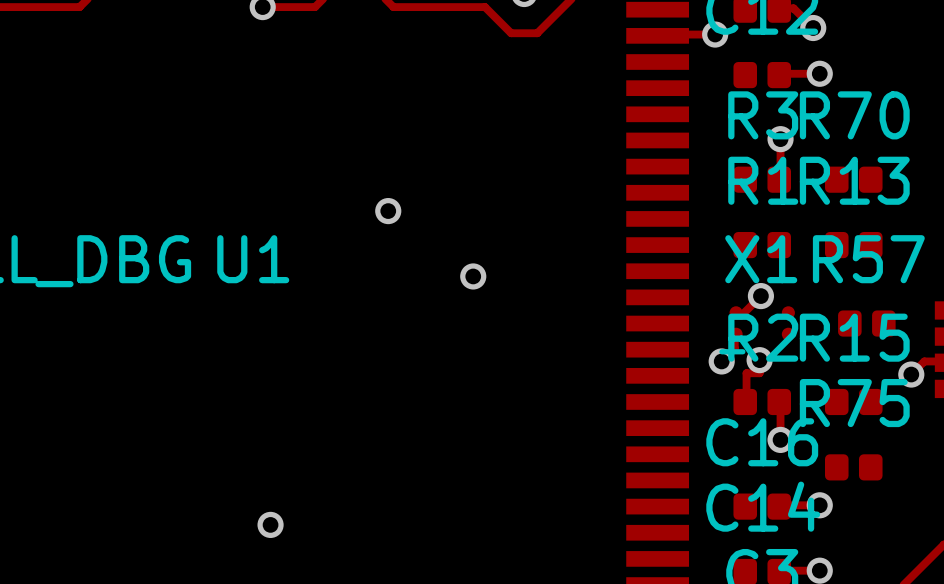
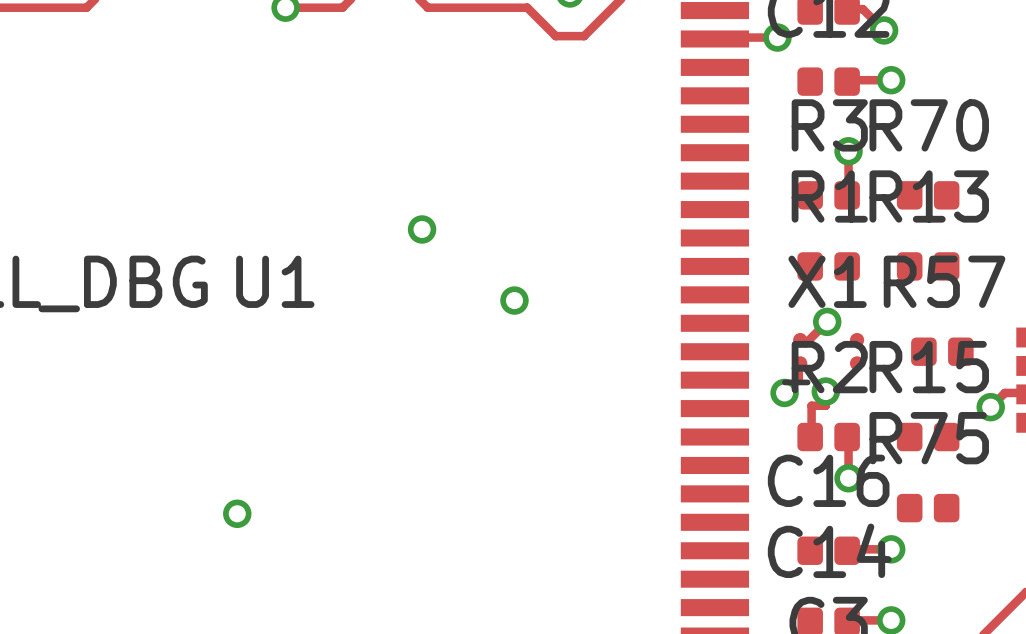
via position: (270, 524) -> (237, 513)

